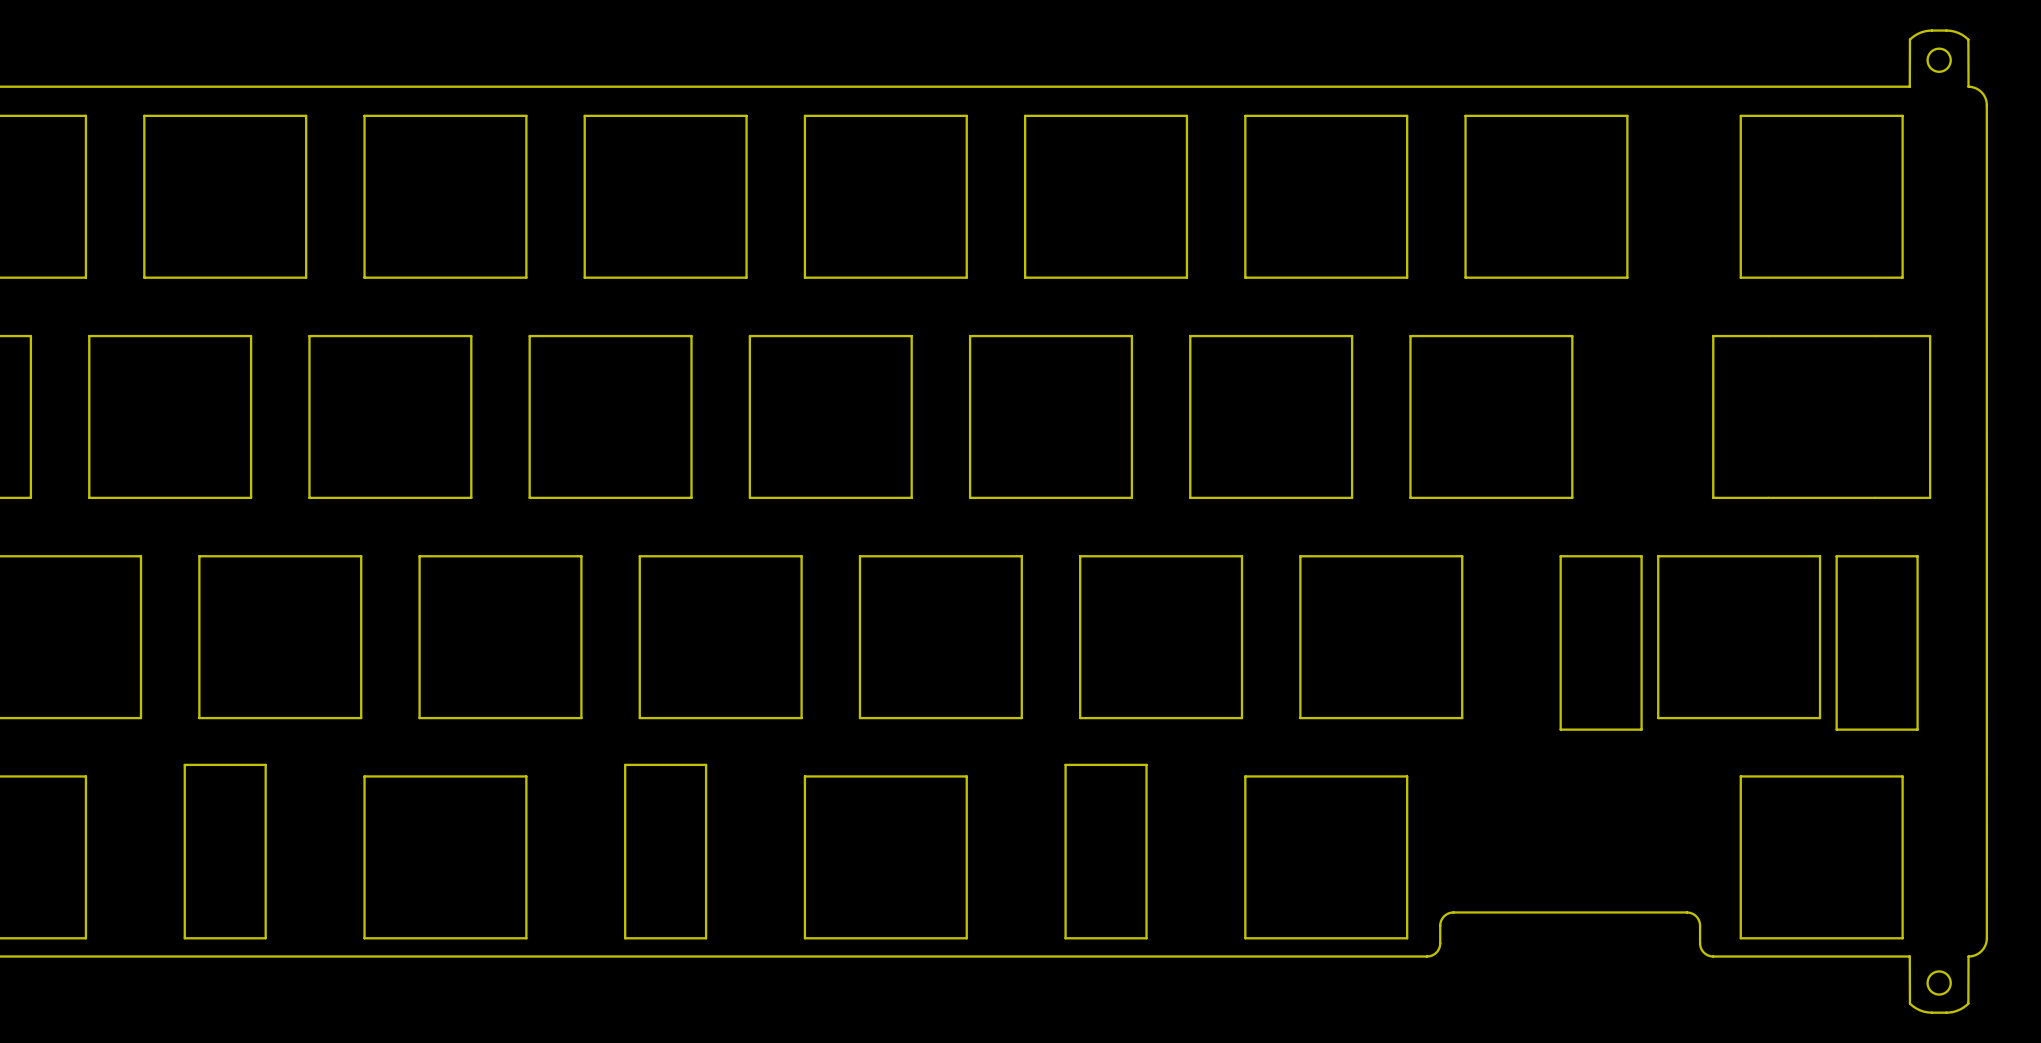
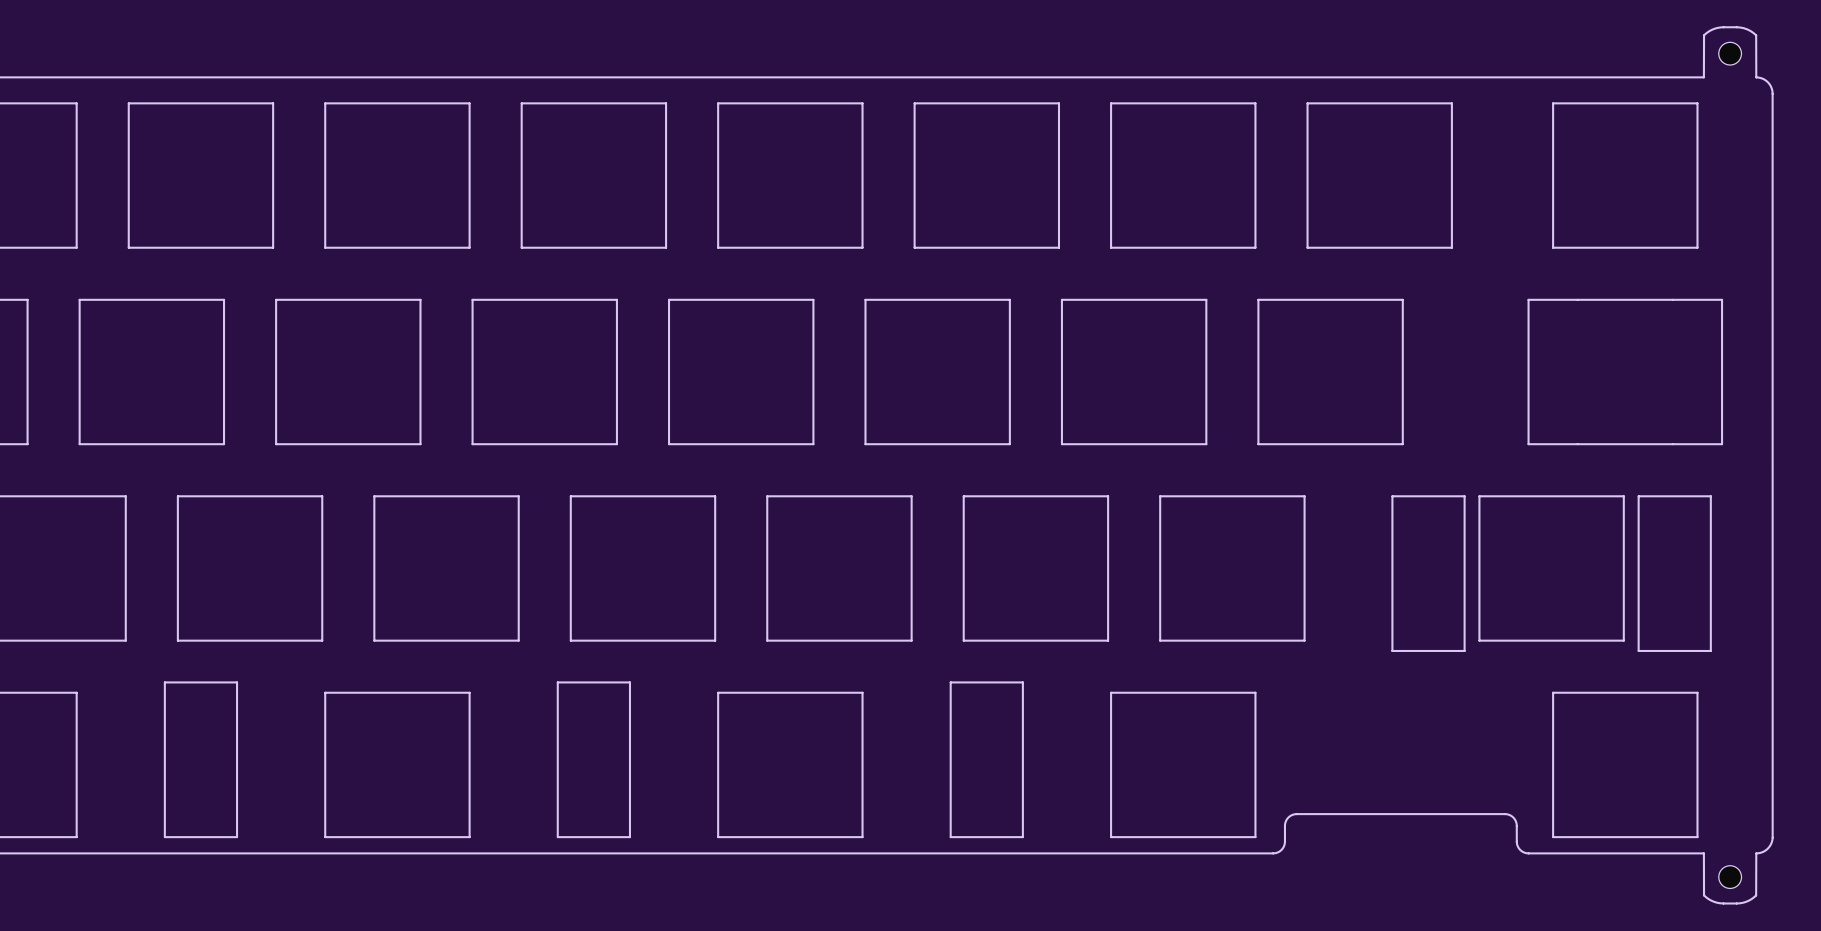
round board edge: [1926, 47, 1952, 73] -> none
part: none -> (1730, 53)
round board edge: [1926, 970, 1952, 996] -> none
part: none -> (1730, 877)

